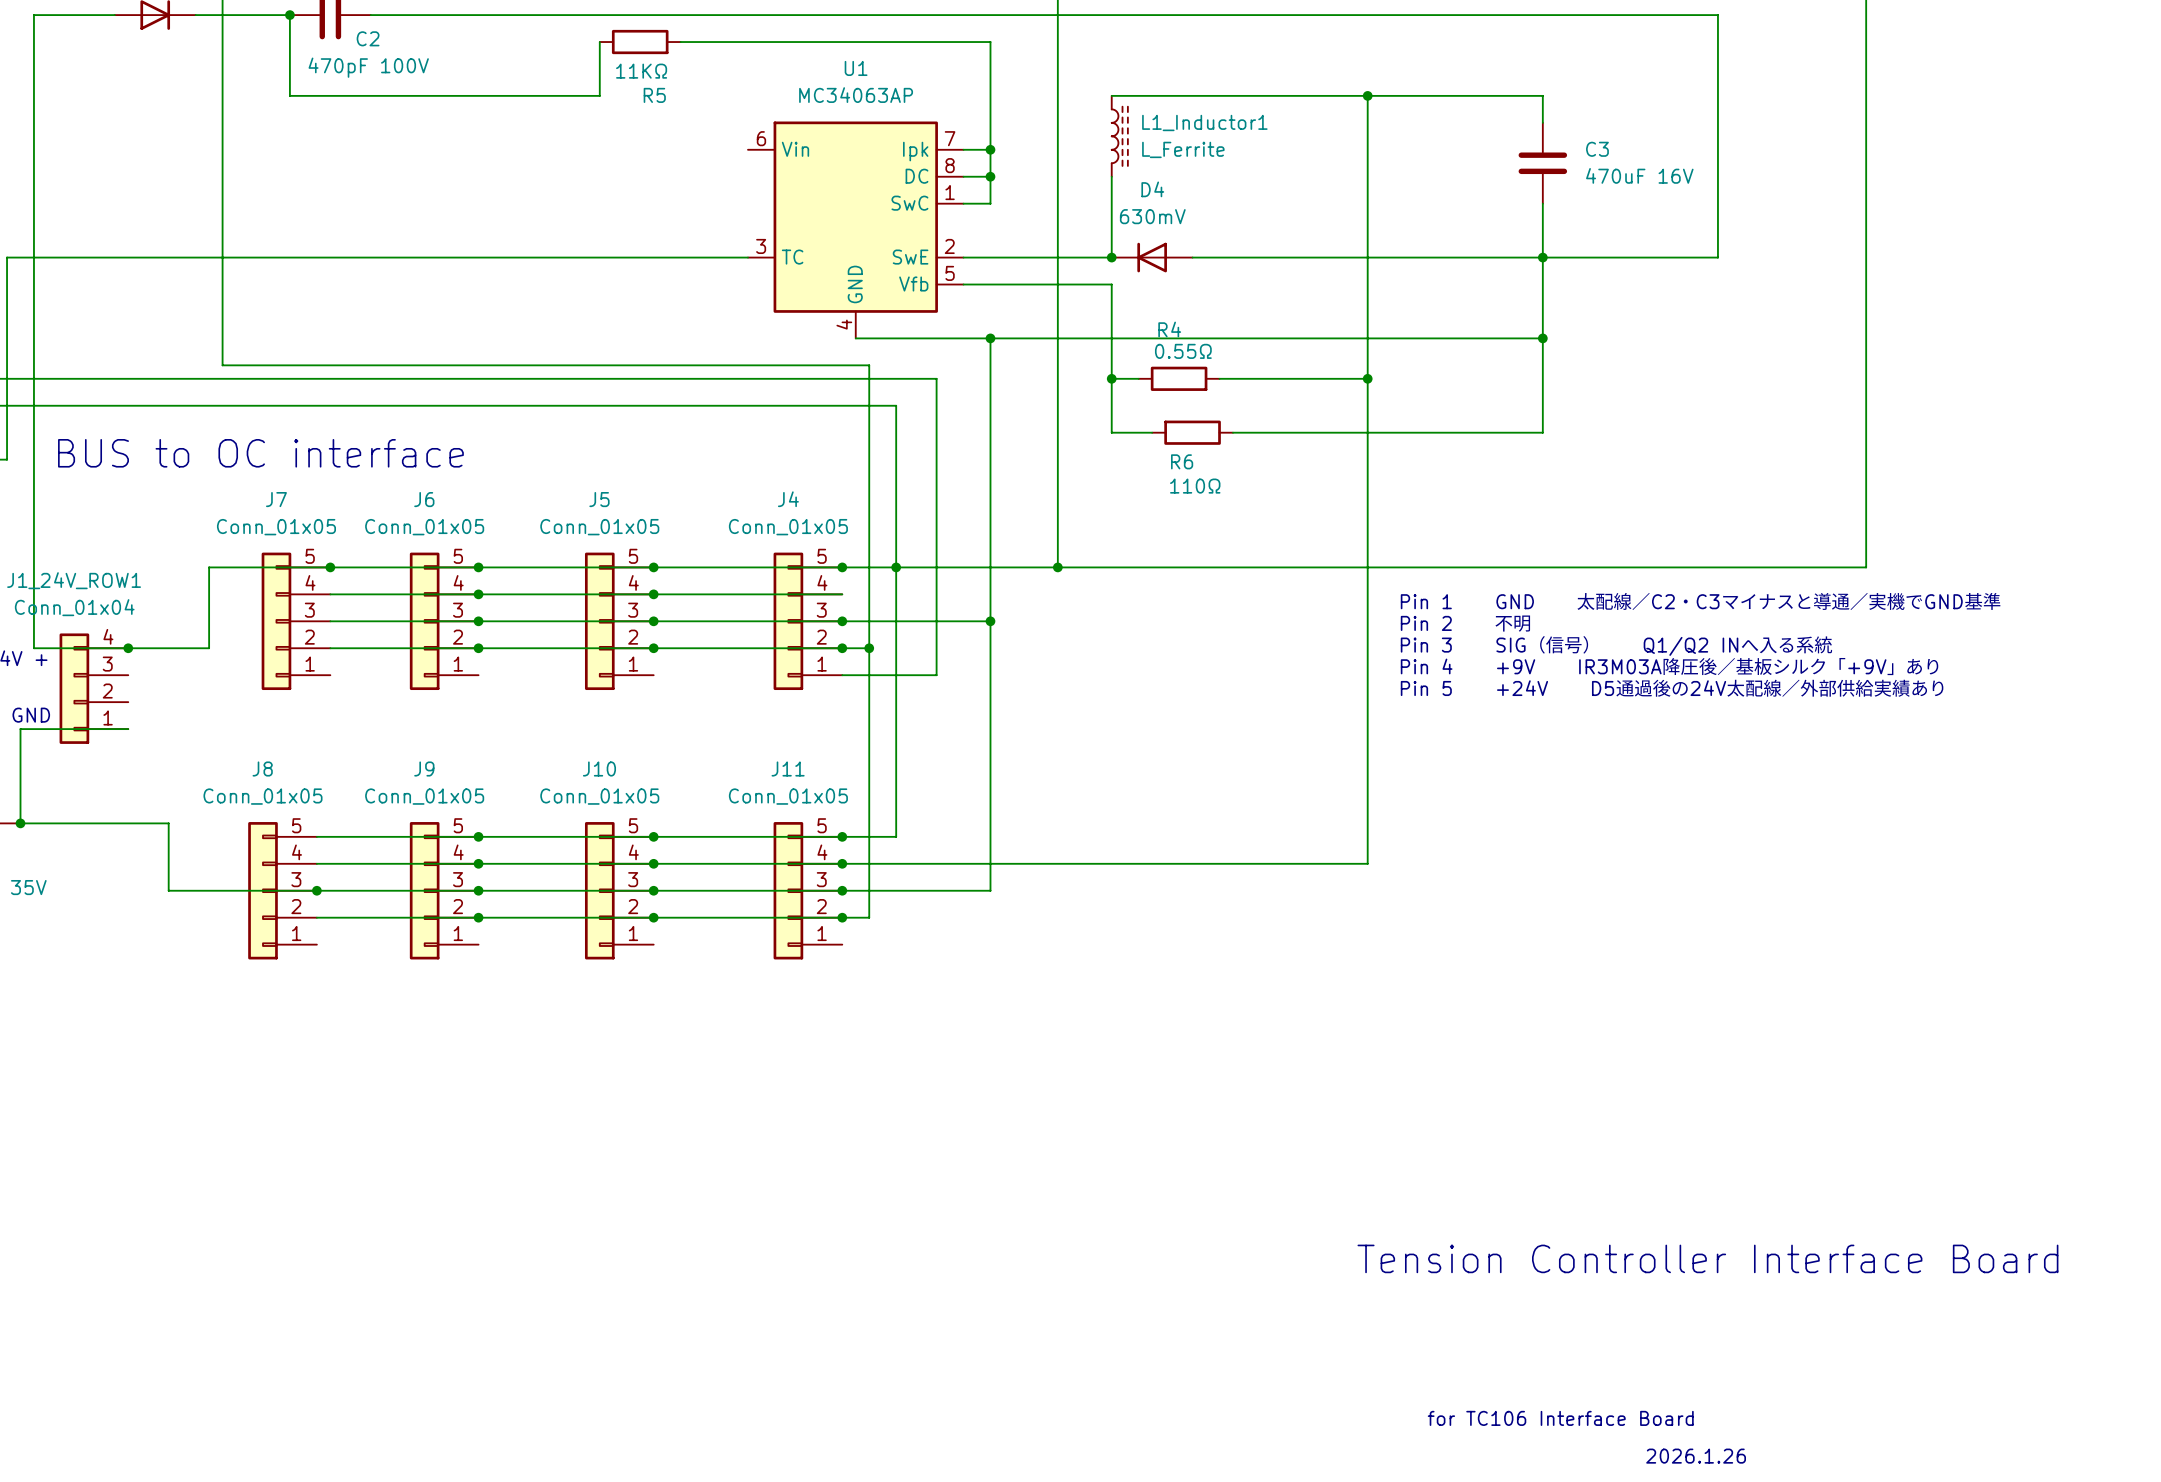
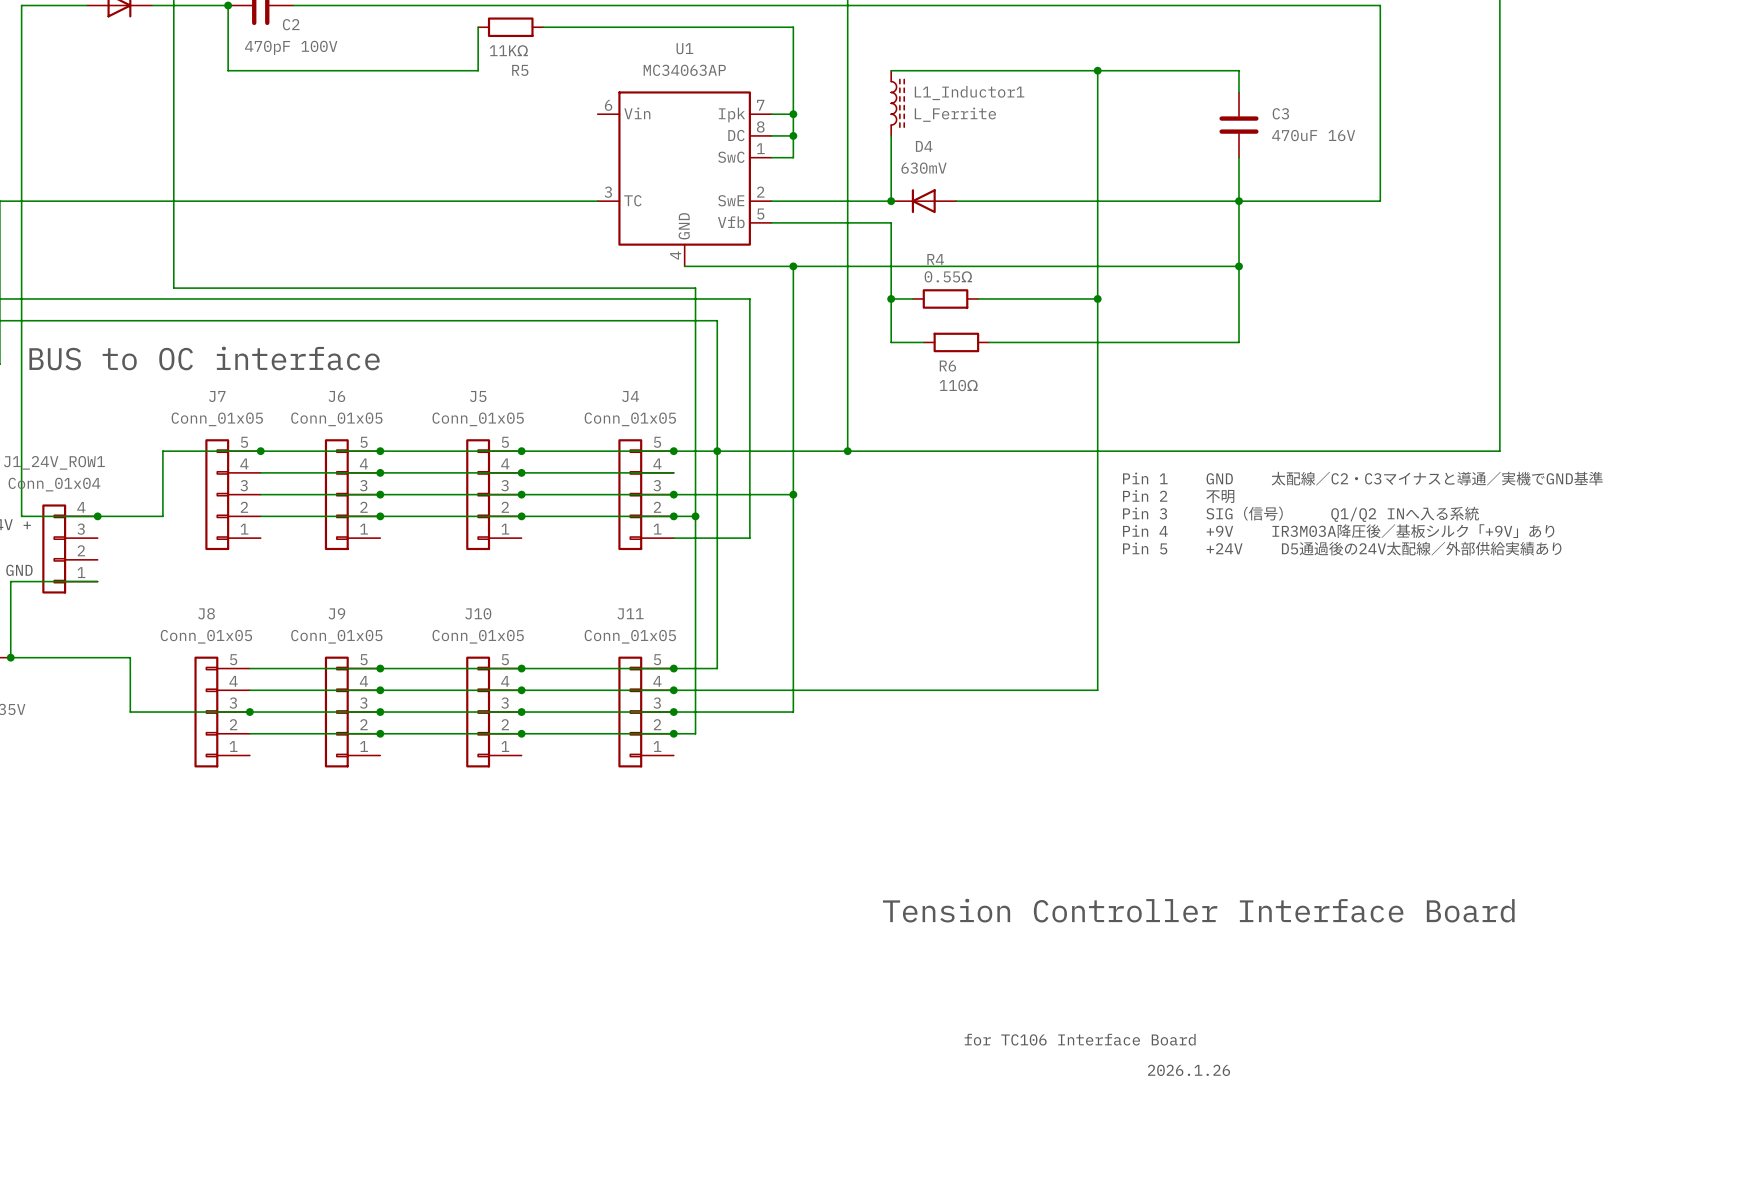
text position: Tension Controller Interface Board (1707, 1258) -> Tension Controller Interface Board (1198, 910)
text position: for TC106 Interface Board (1560, 1418) -> for TC106 Interface Board (1080, 1039)
text position: 2026.1.26 (1696, 1456) -> 2026.1.26 (1189, 1070)

